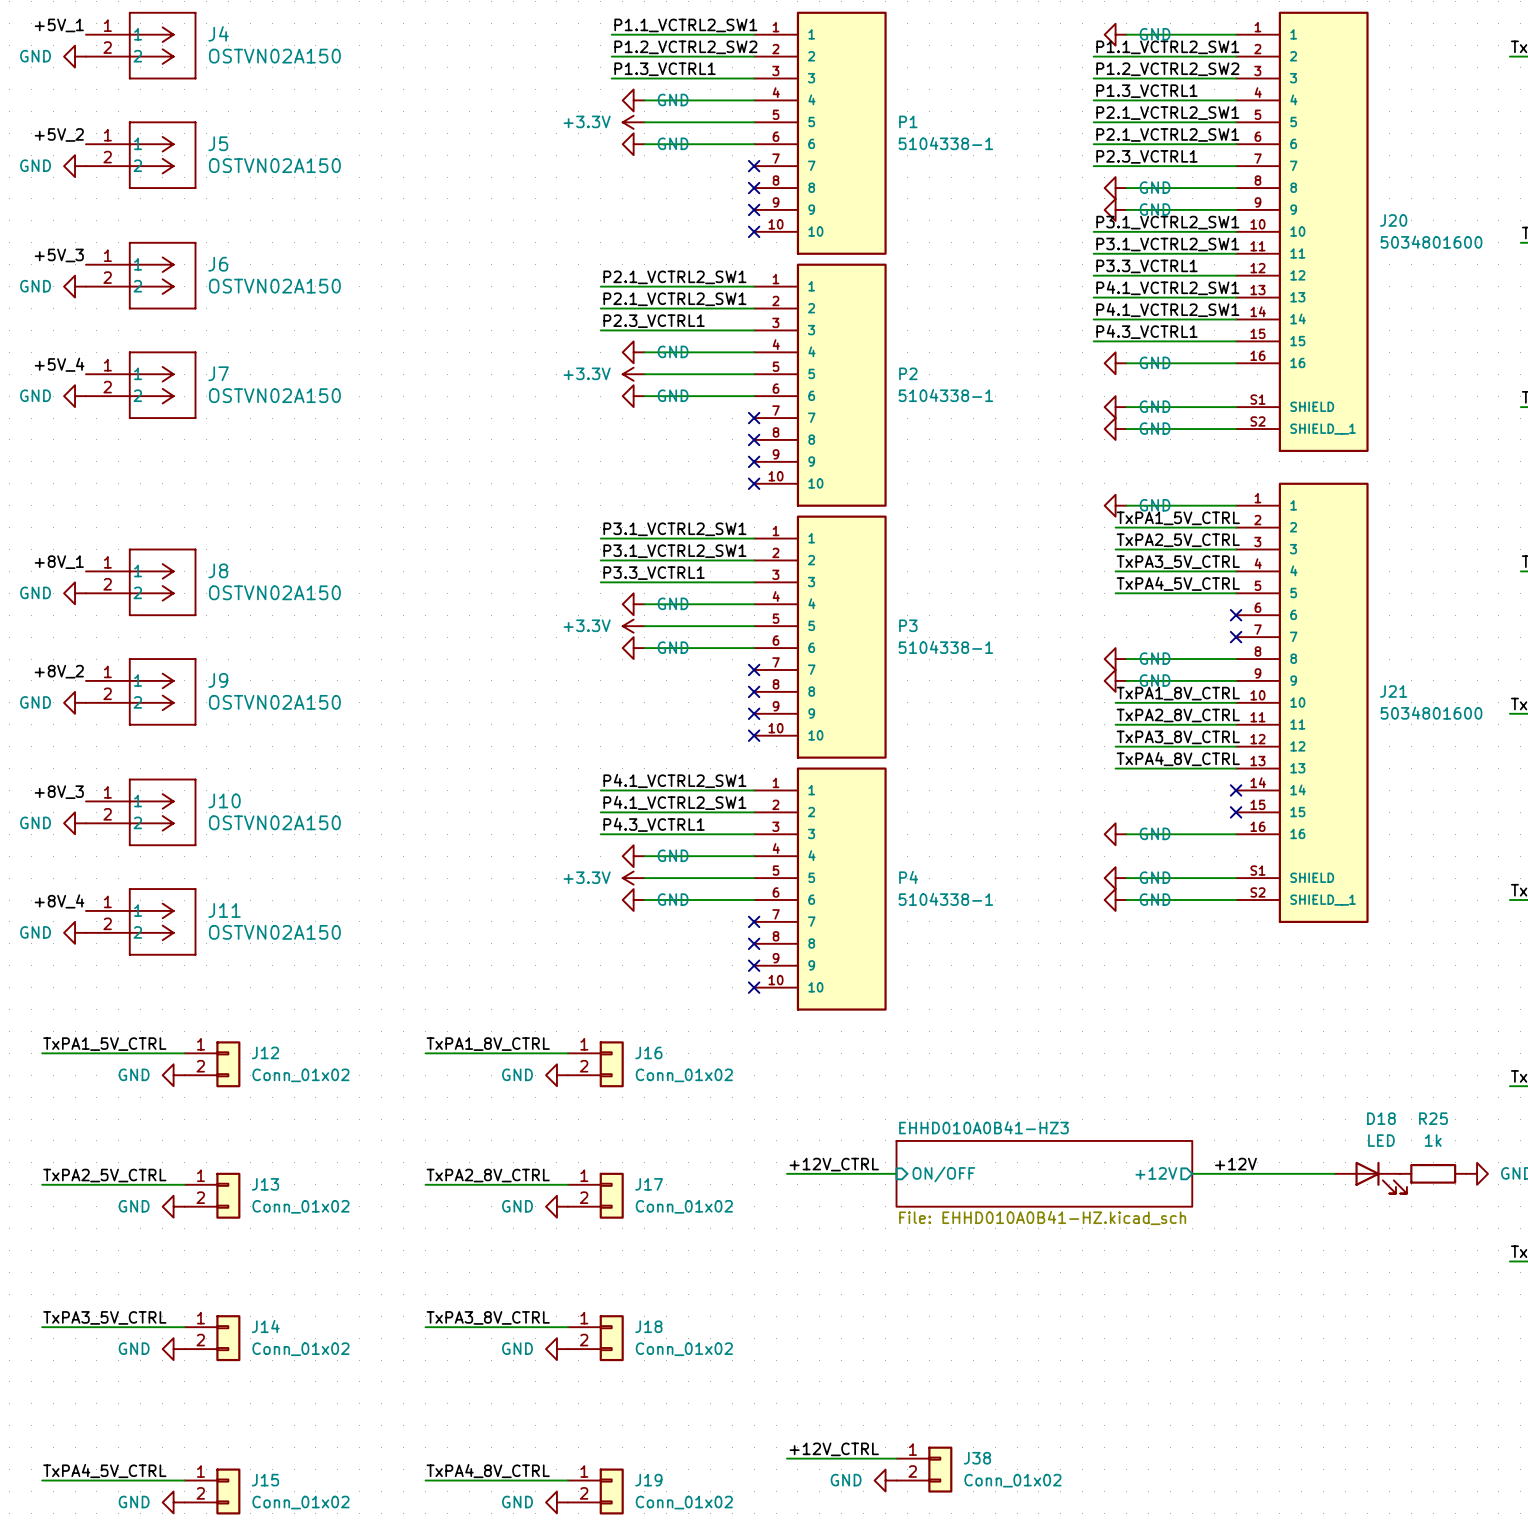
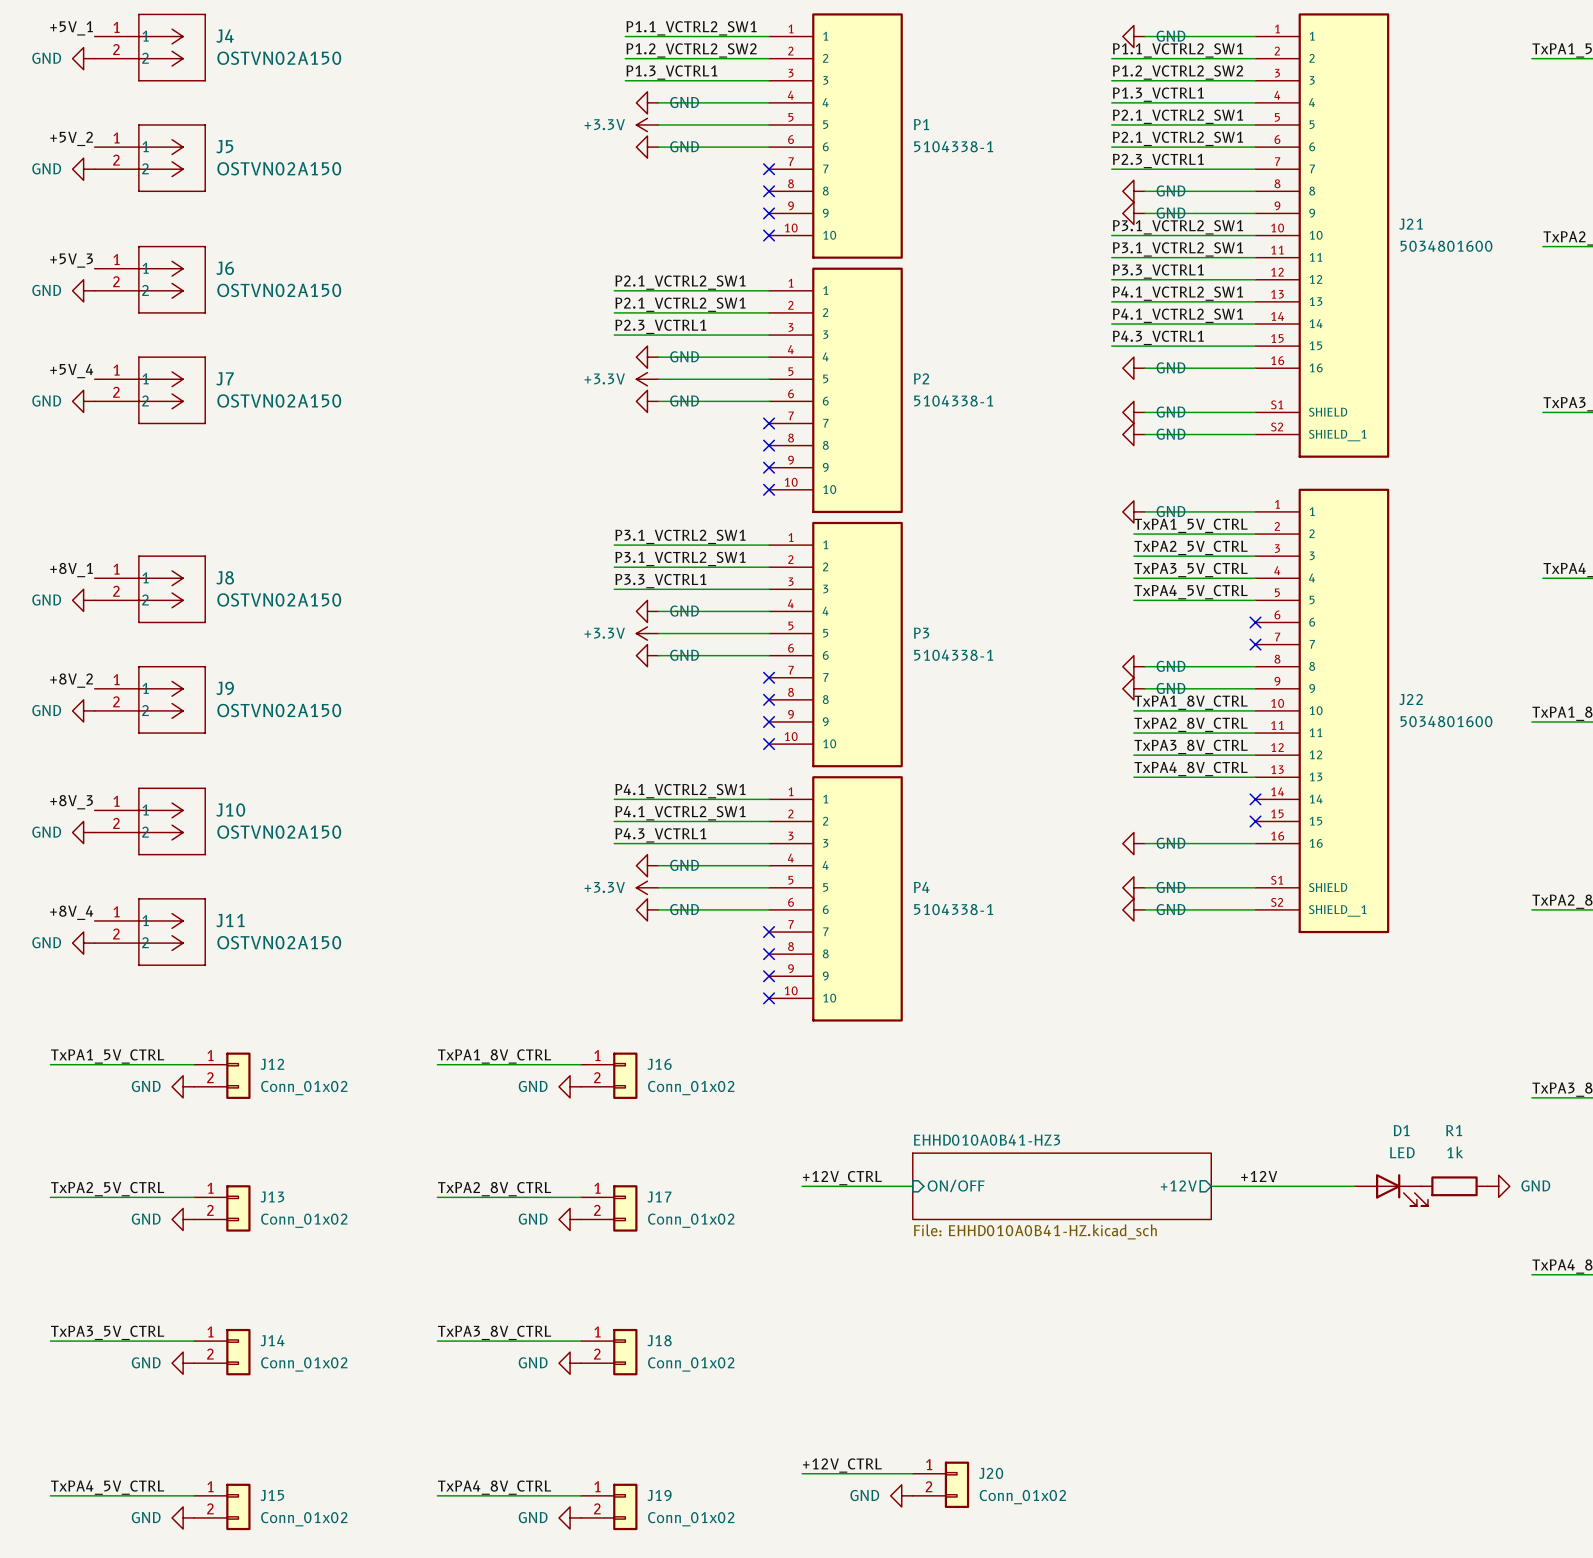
J20 name: J20 (1393, 220) -> J21 (1411, 224)
J21 name: J21 (1393, 691) -> J22 (1411, 699)
D18 name: D18 (1381, 1118) -> D1 (1401, 1130)
R25 name: R25 (1433, 1118) -> R1 (1454, 1130)
J38 name: J38 (977, 1458) -> J20 (991, 1473)

